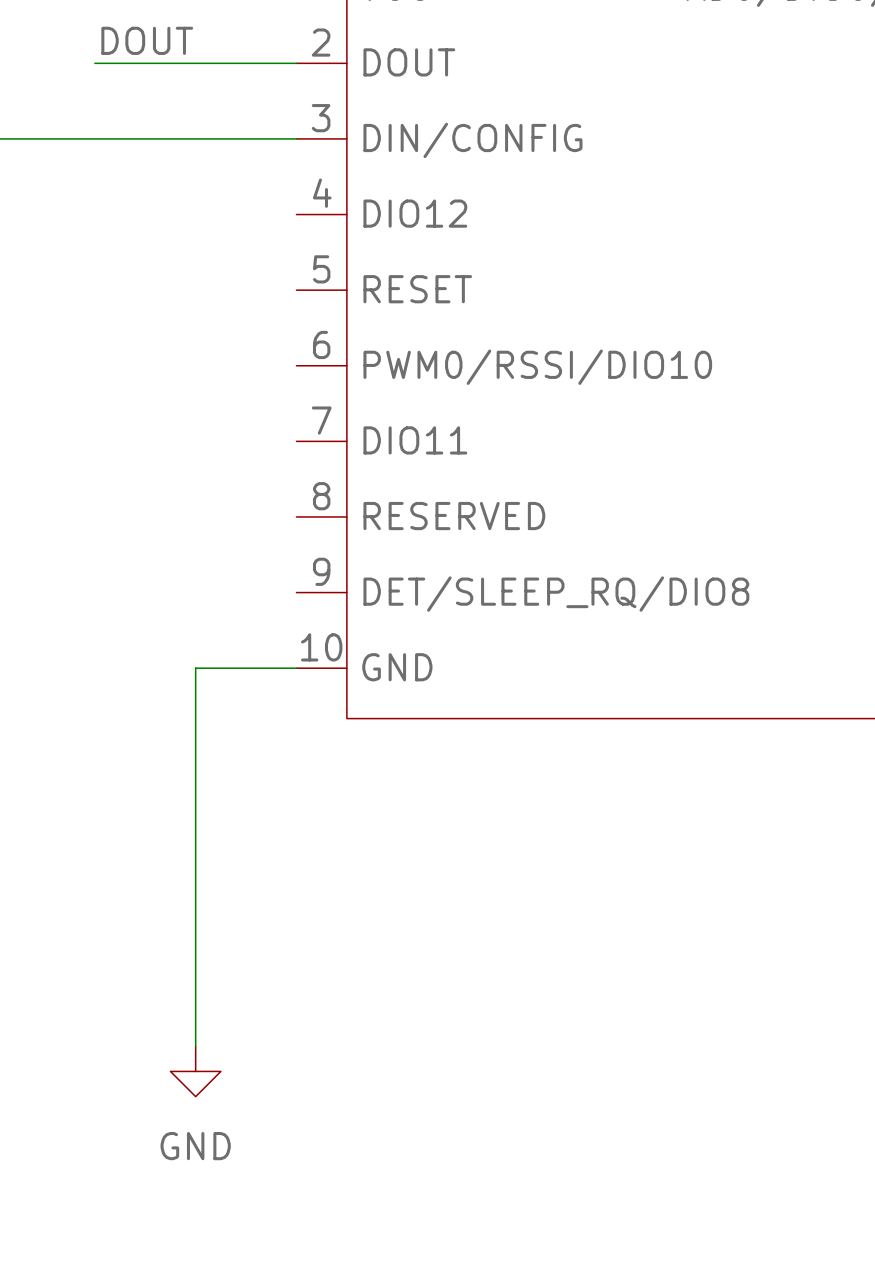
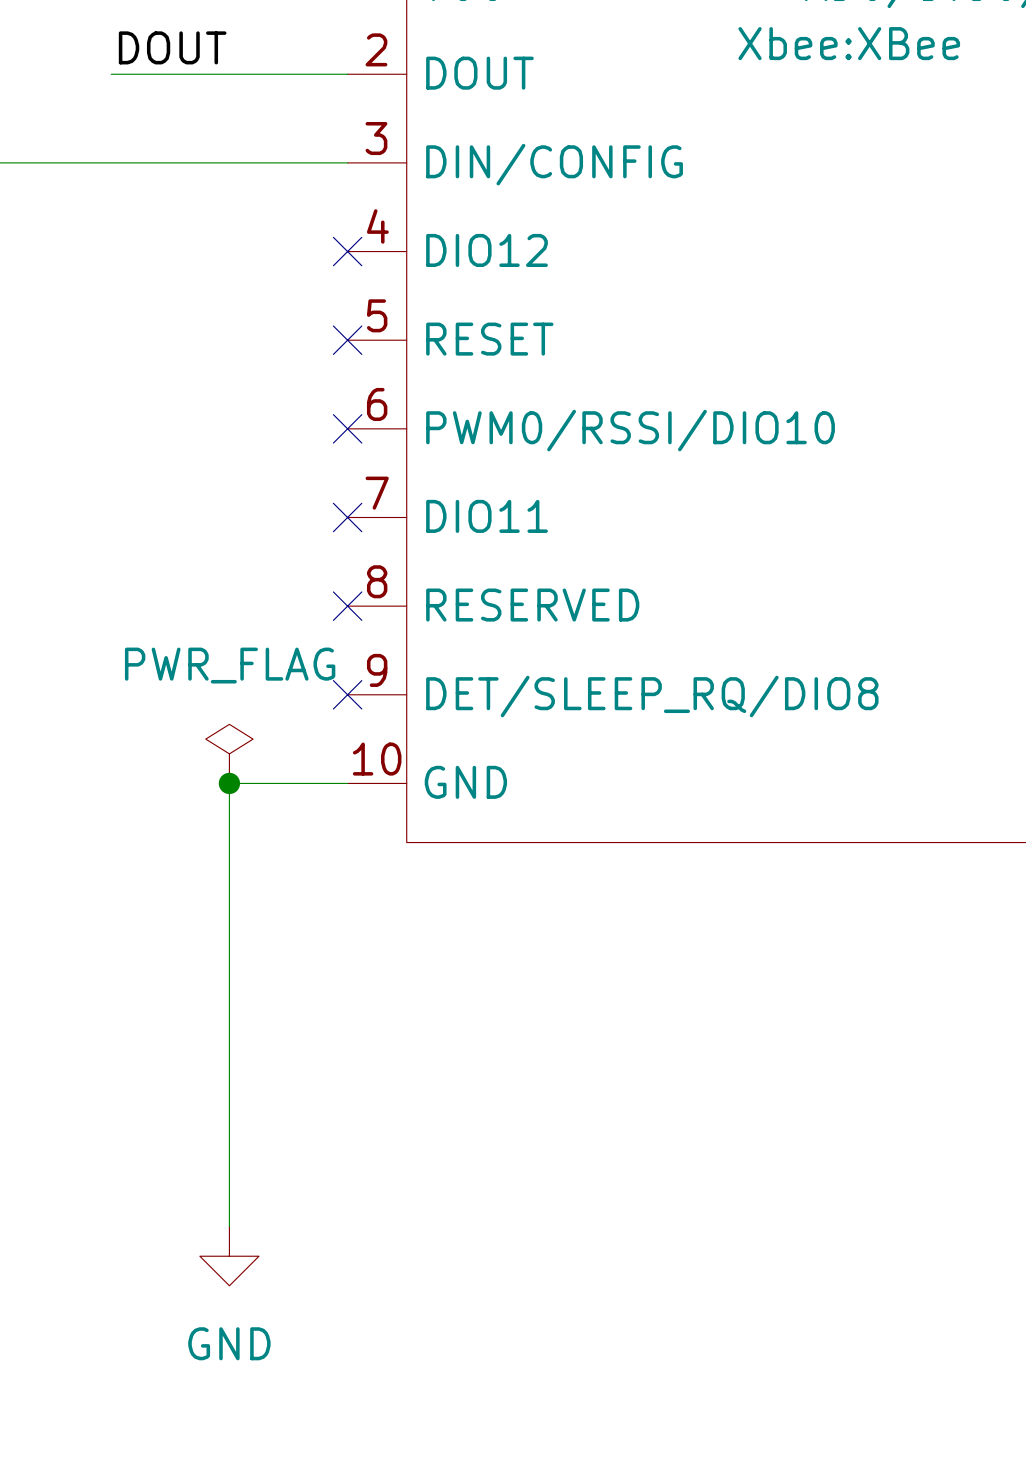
part text: none -> Xbee:XBee (849, 43)
no-connect mark: none -> (347, 251)
no-connect mark: none -> (347, 340)
no-connect mark: none -> (347, 428)
no-connect mark: none -> (347, 517)
no-connect mark: none -> (347, 606)
no-connect mark: none -> (347, 694)
power symbol: none -> PWR_FLAG (229, 753)
junction: none -> (229, 783)

